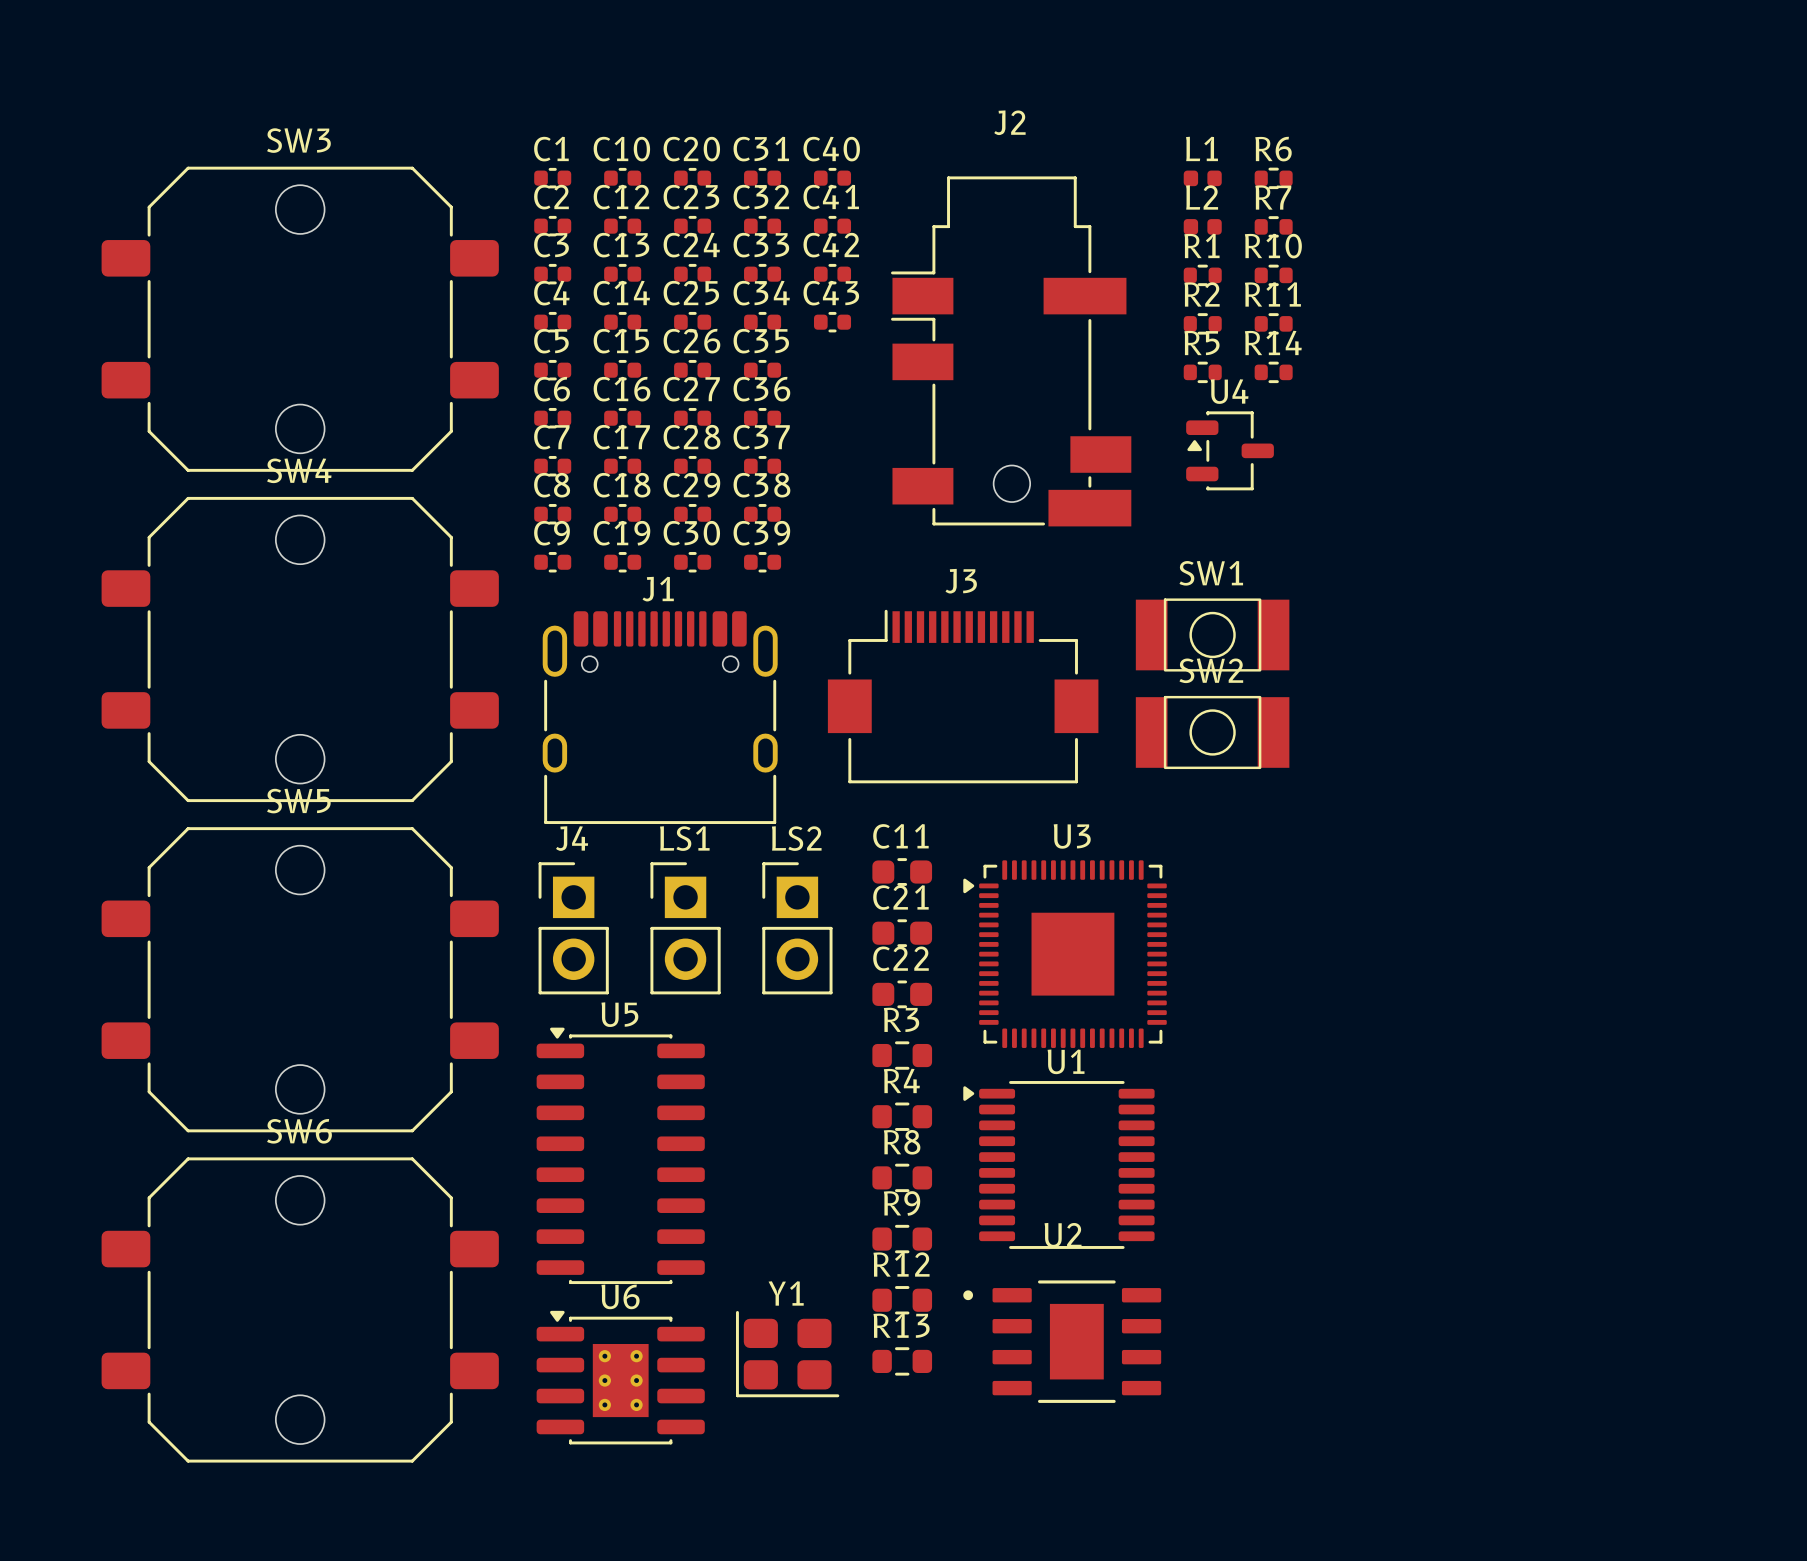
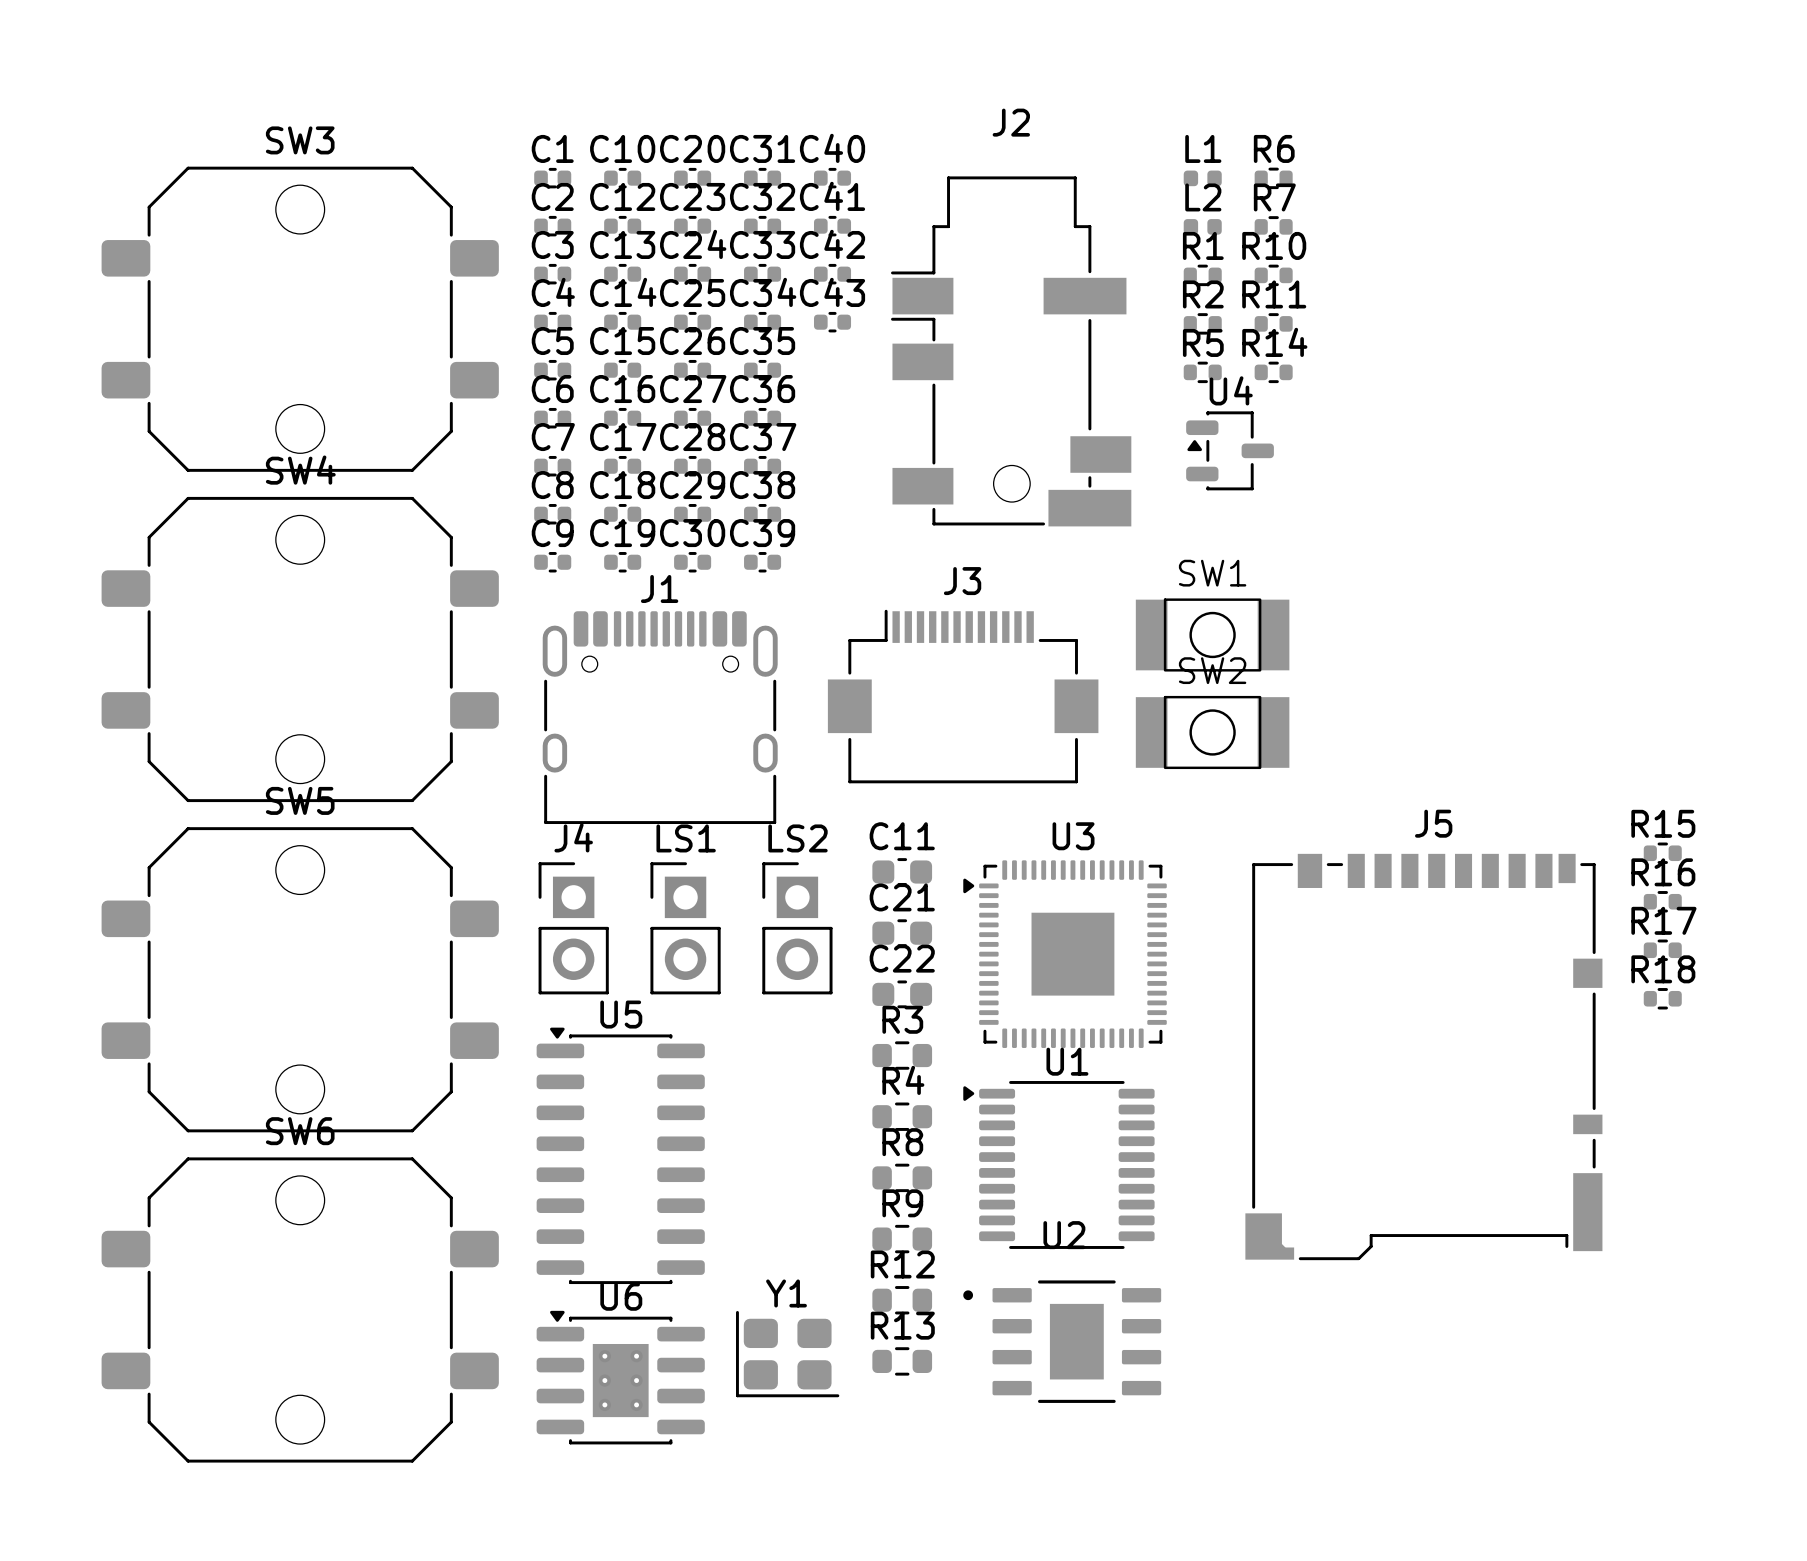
R15: none -> (1662, 853)
R16: none -> (1662, 901)
R17: none -> (1662, 950)
R18: none -> (1662, 998)
J5: none -> (1423, 1057)

